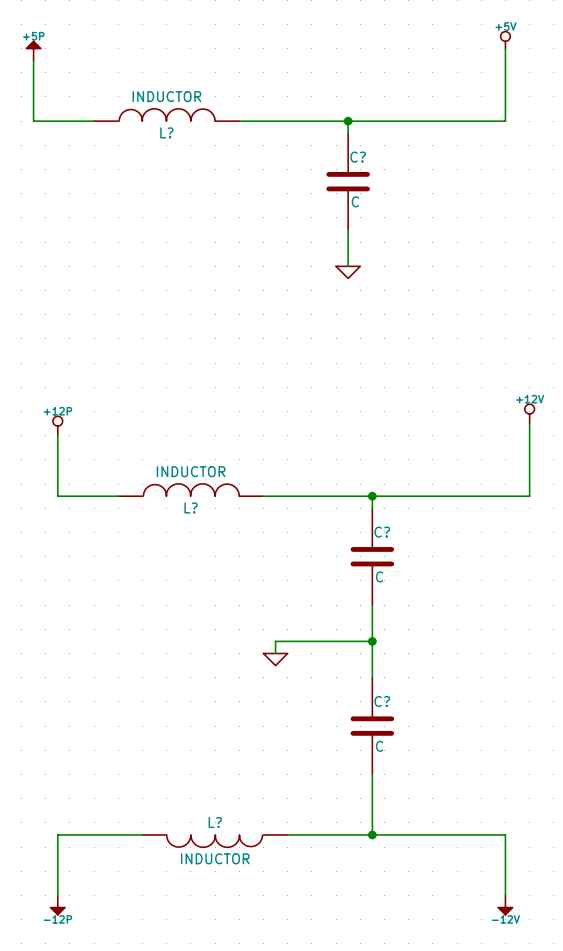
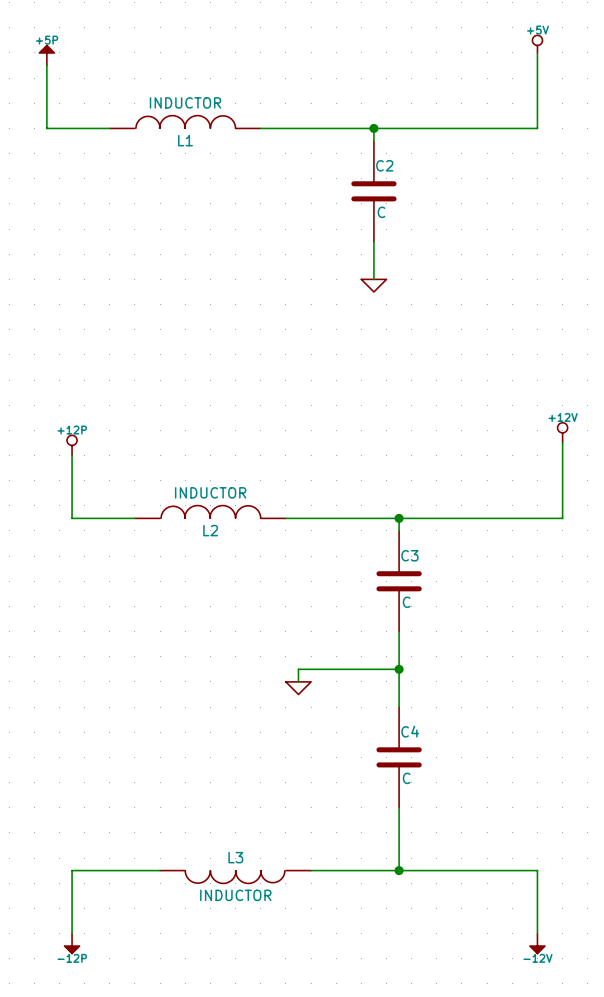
L? name: L? (166, 132) -> L1 (185, 140)
C? name: C? (358, 157) -> C2 (384, 165)
L? name: L? (191, 507) -> L2 (210, 530)
C? name: C? (382, 532) -> C3 (409, 555)
C? name: C? (382, 701) -> C4 (410, 731)
L? name: L? (215, 822) -> L3 (235, 857)

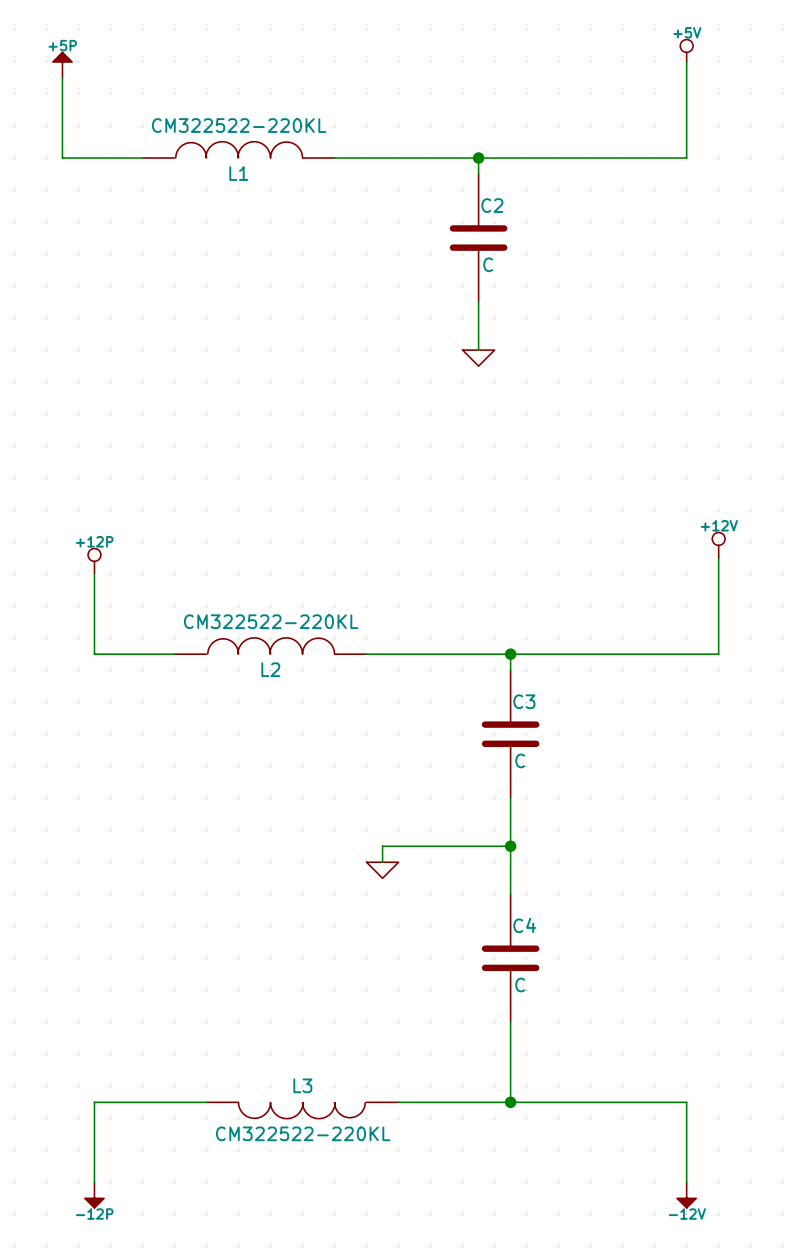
L1 value: INDUCTOR (185, 102) -> CM322522-220KL (239, 125)
L2 value: INDUCTOR (210, 492) -> CM322522-220KL (271, 621)
L3 value: INDUCTOR (235, 895) -> CM322522-220KL (303, 1133)

